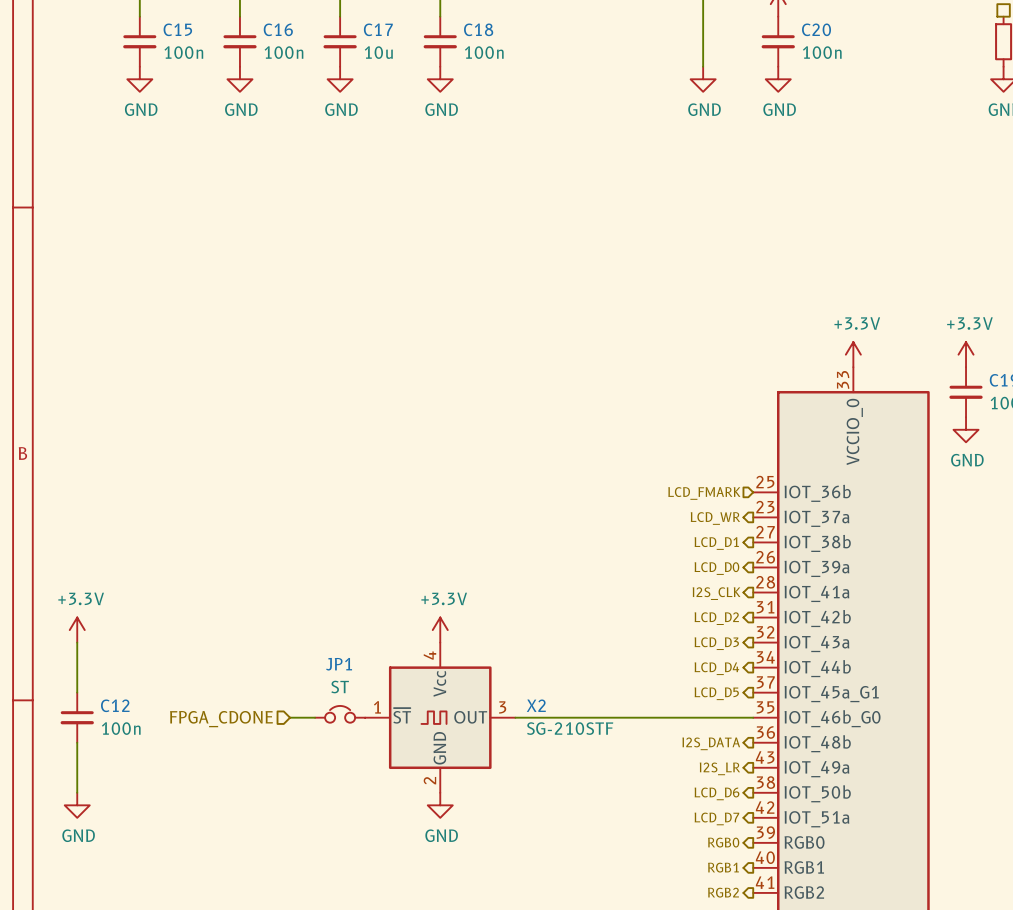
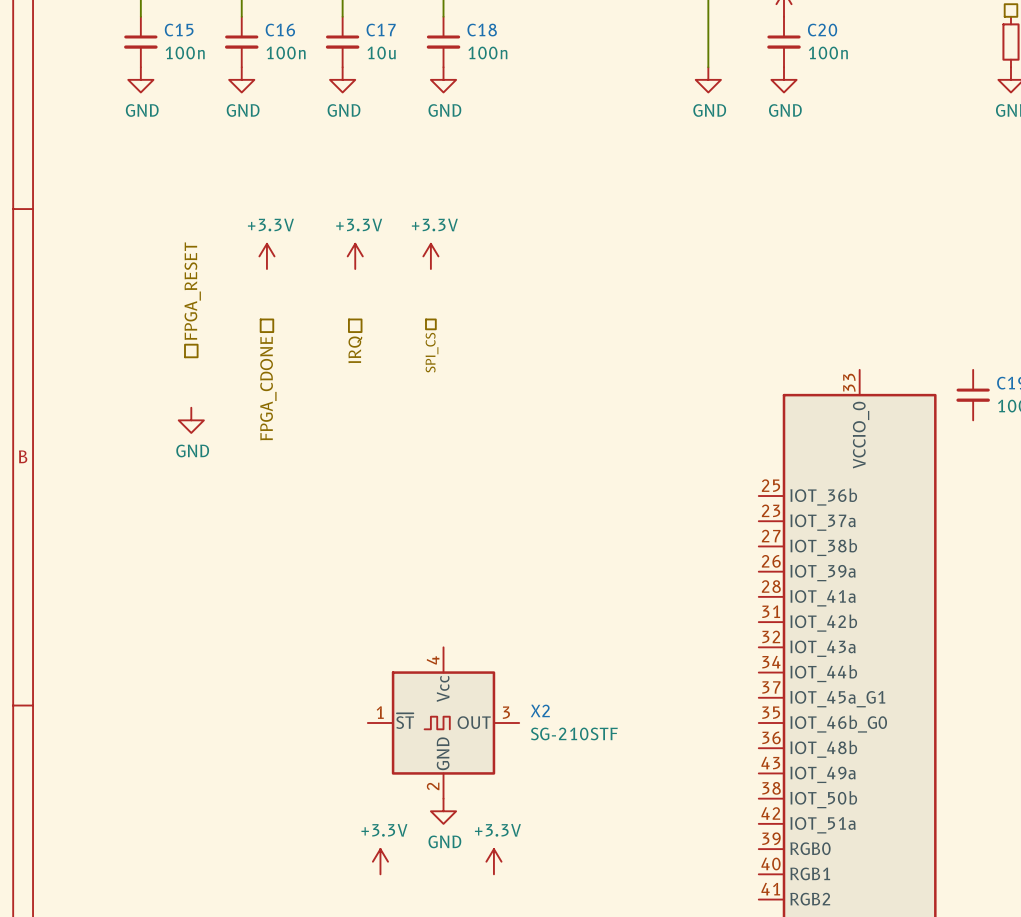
power symbol: none -> +3.3V (266, 256)
power symbol: none -> +3.3V (355, 256)
power symbol: none -> +3.3V (430, 256)
hierarchical label: none -> FPGA_RESET (192, 291)
hierarchical label: none -> IRQ (355, 349)
hierarchical label: none -> SPI_CS (432, 352)
power symbol: +3.3V (853, 354) -> none
power symbol: +3.3V (966, 354) -> none
hierarchical label: none -> FPGA_CDONE (268, 388)
power symbol: none -> GND (191, 420)
power symbol: GND (966, 429) -> none
hierarchical label: LCD_FMARK (704, 493) -> none
hierarchical label: LCD_WR (715, 518) -> none
hierarchical label: LCD_D1 (716, 543) -> none
hierarchical label: LCD_D0 (716, 568) -> none
hierarchical label: I2S_CLK (716, 593) -> none
hierarchical label: LCD_D2 (716, 618) -> none
power symbol: +3.3V (77, 630) -> none
power symbol: +3.3V (440, 630) -> none
wire: (77, 642) (77, 692) -> none
hierarchical label: LCD_D3 (716, 643) -> none
hierarchical label: LCD_D4 (716, 668) -> none
hierarchical label: LCD_D5 (716, 693) -> none
JP1: ST (340, 714) -> none
C12: 100n (77, 717) -> none
wire: (290, 717) (315, 717) -> none
wire: (515, 717) (753, 717) -> none
hierarchical label: FPGA_CDONE (221, 719) -> none
wire: (77, 742) (77, 792) -> none
hierarchical label: I2S_DATA (711, 743) -> none
hierarchical label: I2S_LR (719, 768) -> none
hierarchical label: LCD_D6 (716, 793) -> none
power symbol: GND (77, 805) -> none
hierarchical label: LCD_D7 (716, 818) -> none
hierarchical label: RGB0 (723, 842) -> none
power symbol: none -> +3.3V (380, 861)
power symbol: none -> +3.3V (493, 861)
hierarchical label: RGB1 (723, 867) -> none
hierarchical label: RGB2 (723, 892) -> none

